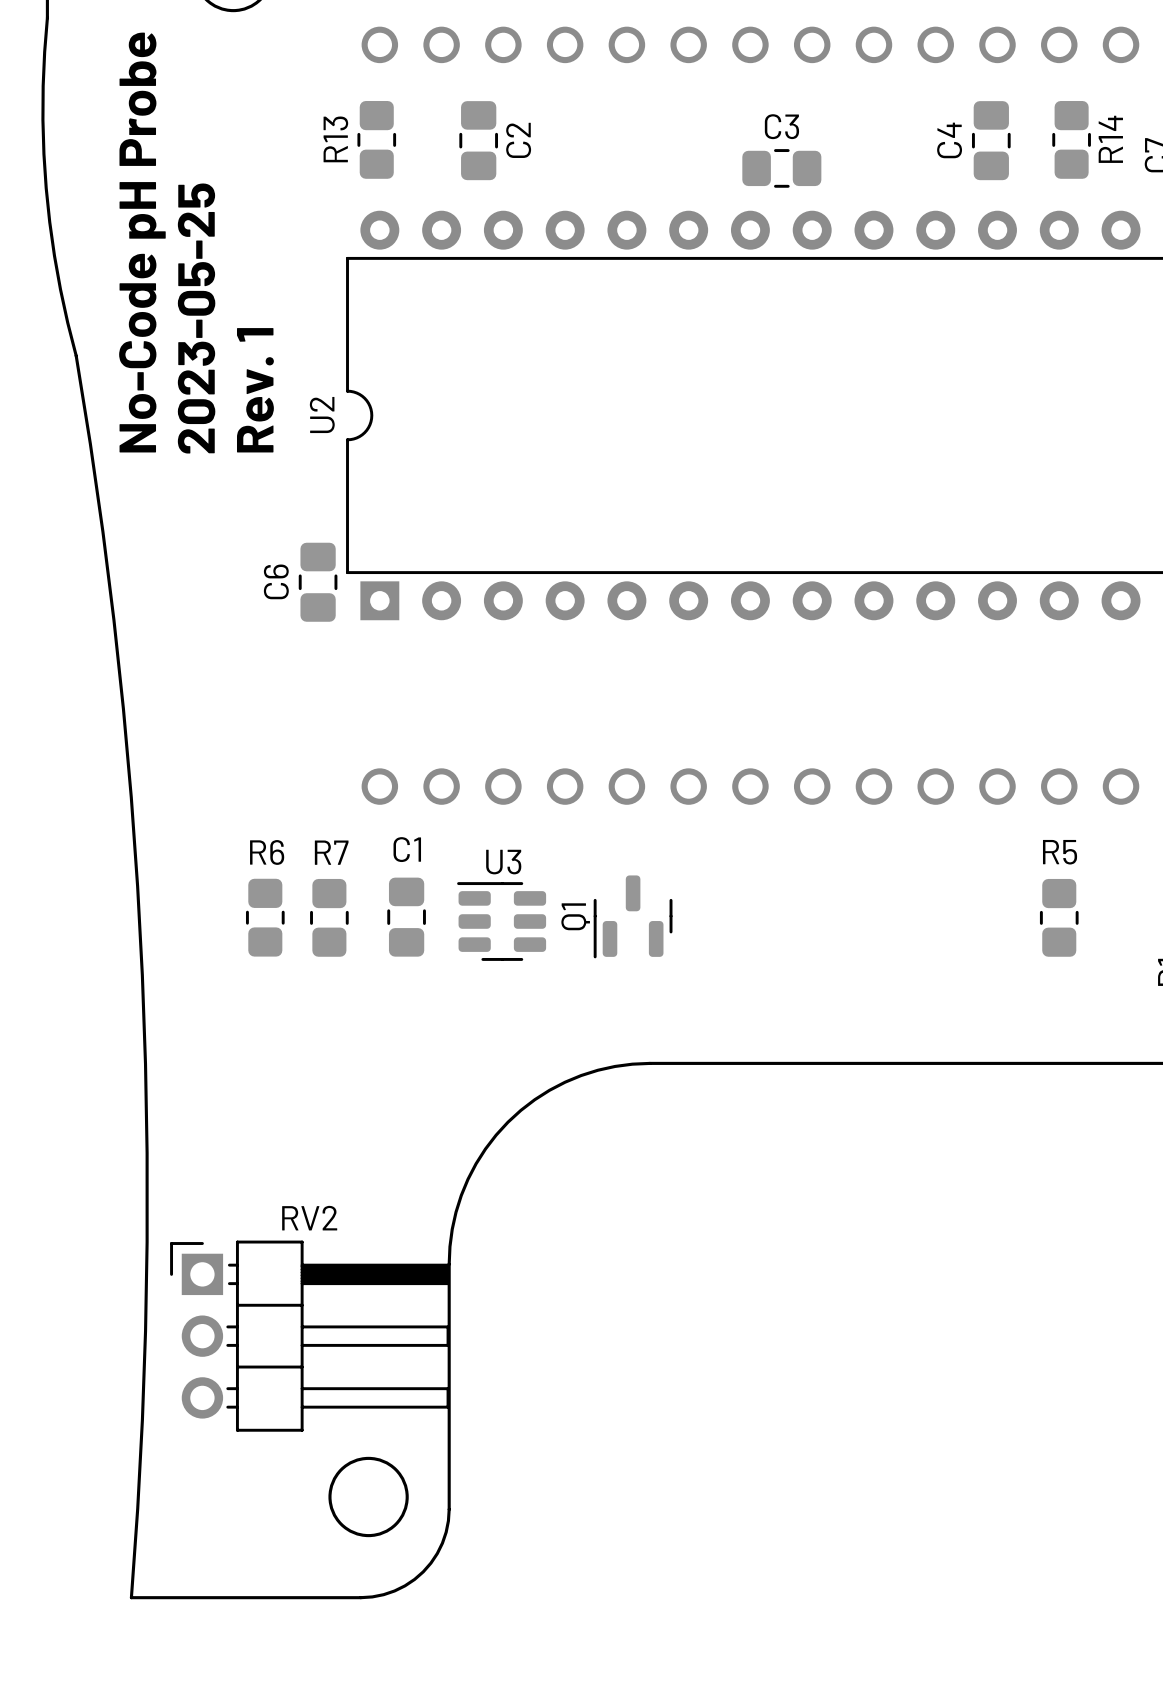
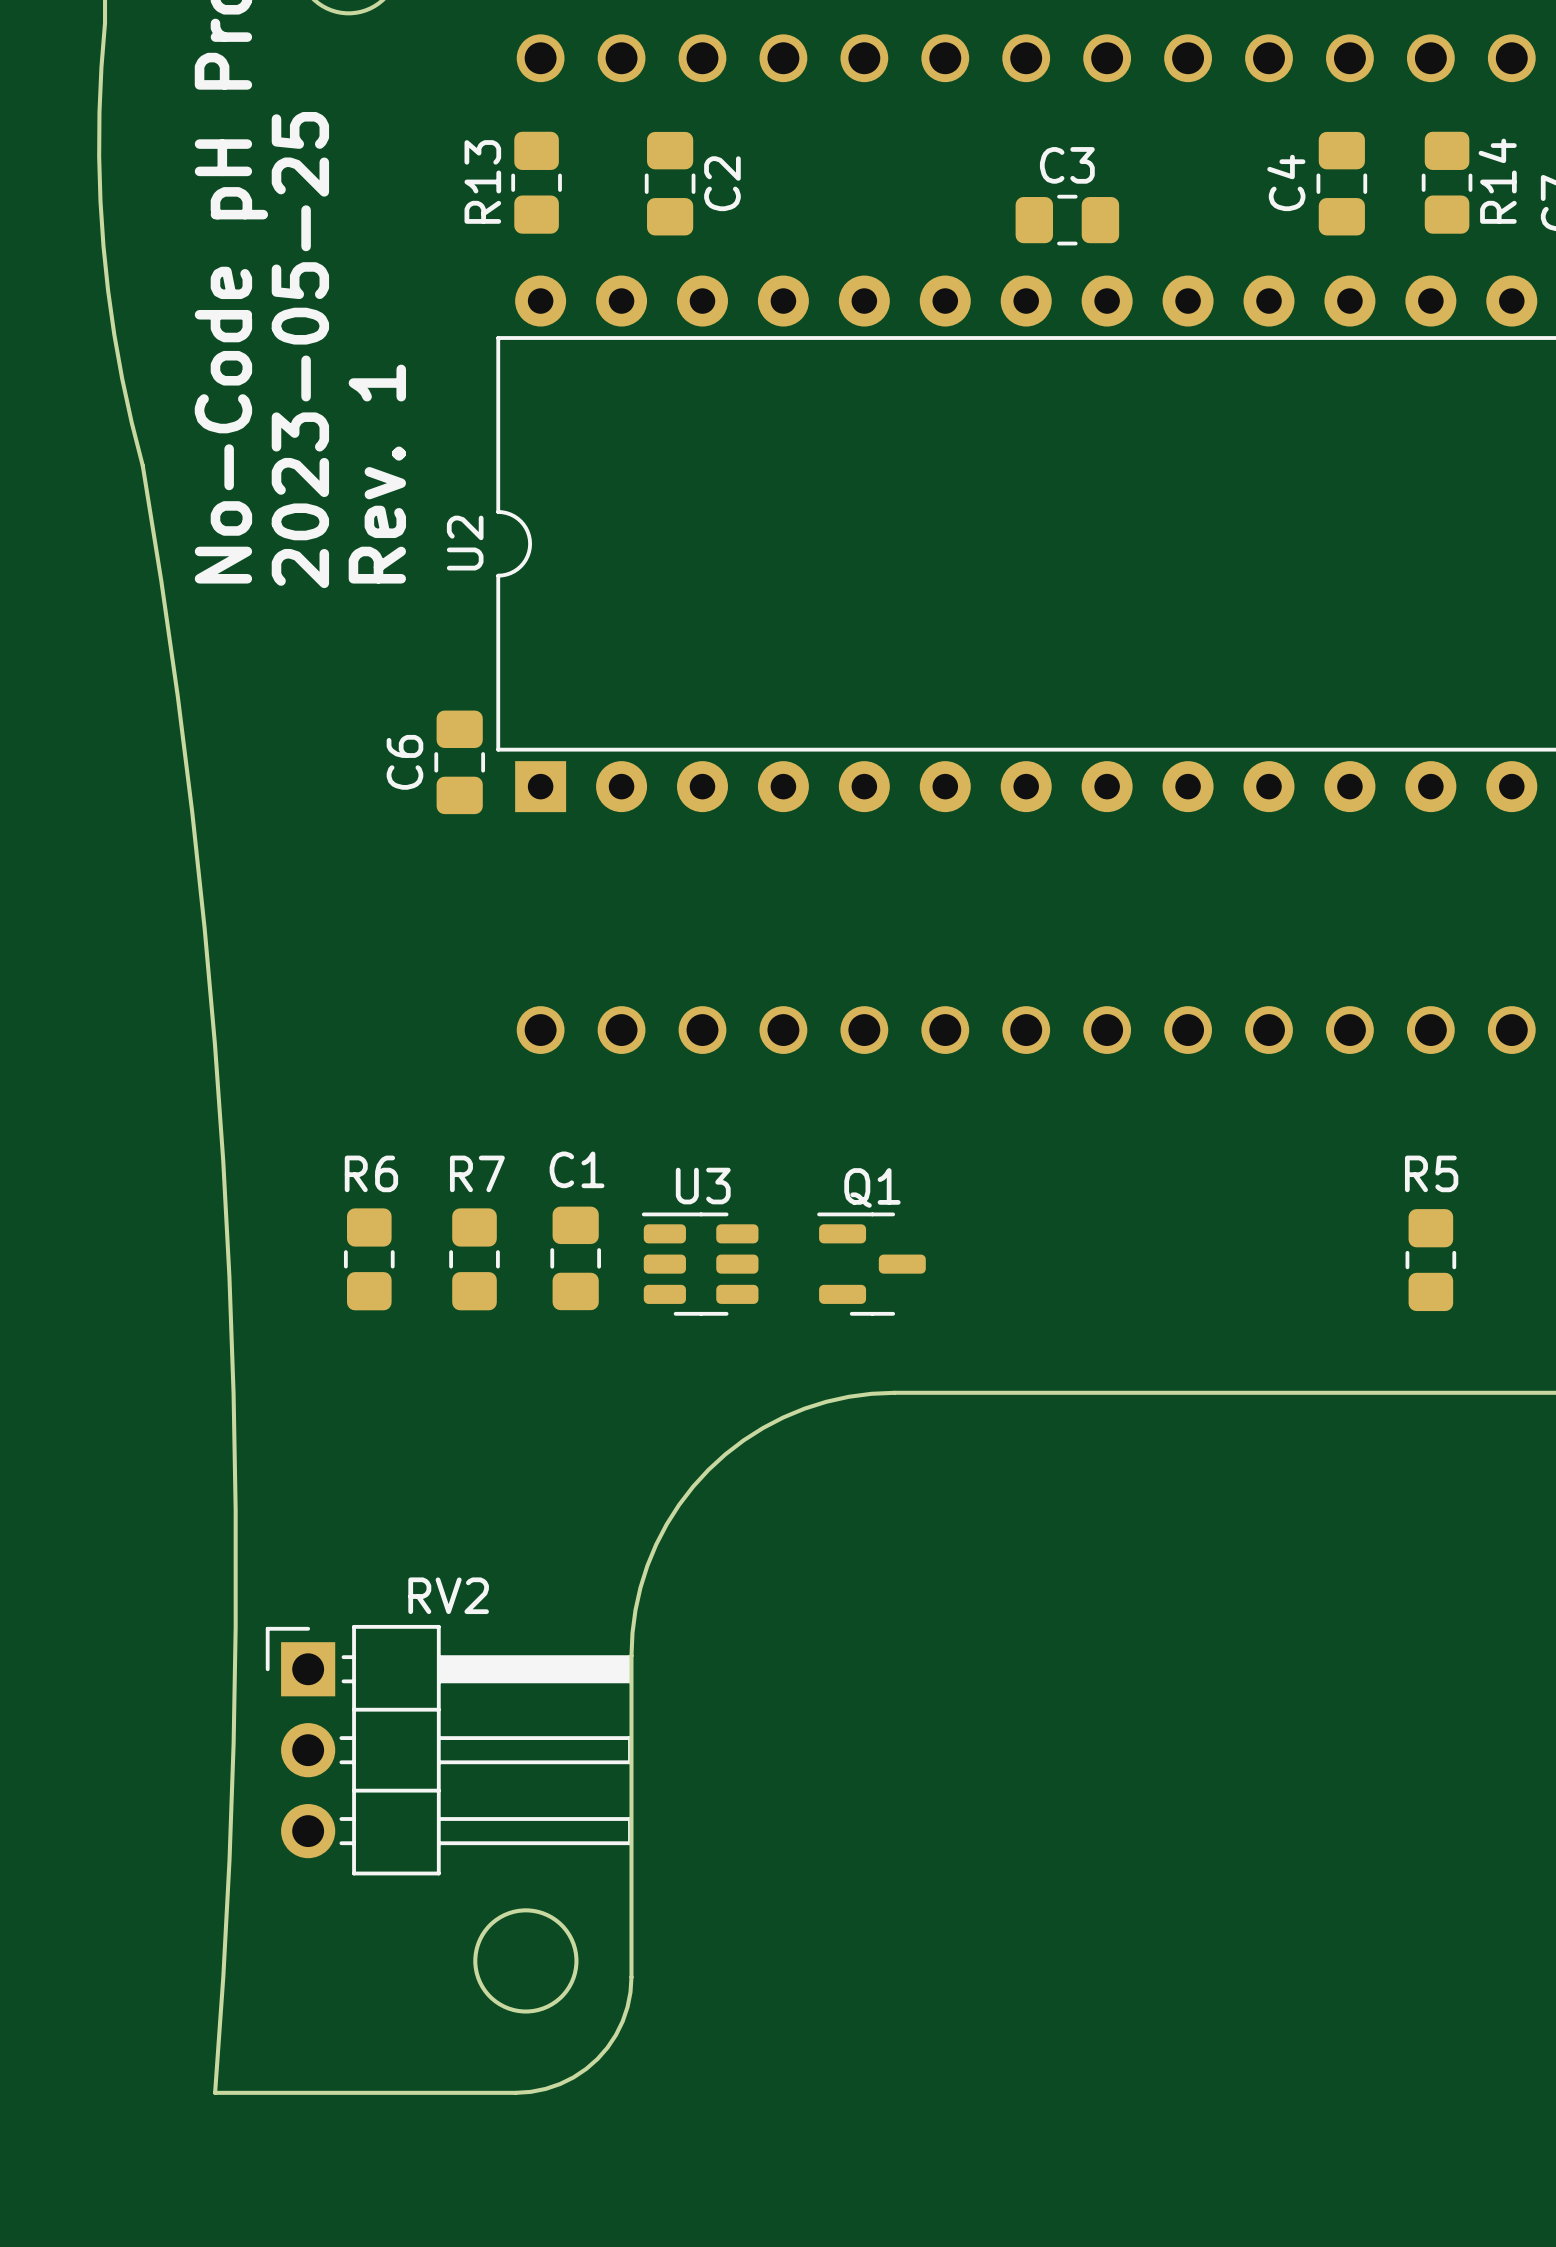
Q1 rotation: 0° (633, 916) -> 90° clockwise (871, 1264)
R6 position: (265, 917) -> (369, 1259)
R7 position: (329, 917) -> (474, 1259)
C1 position: (406, 917) -> (575, 1258)
R5 position: (1059, 917) -> (1430, 1260)
U3 position: (501, 921) -> (700, 1264)

